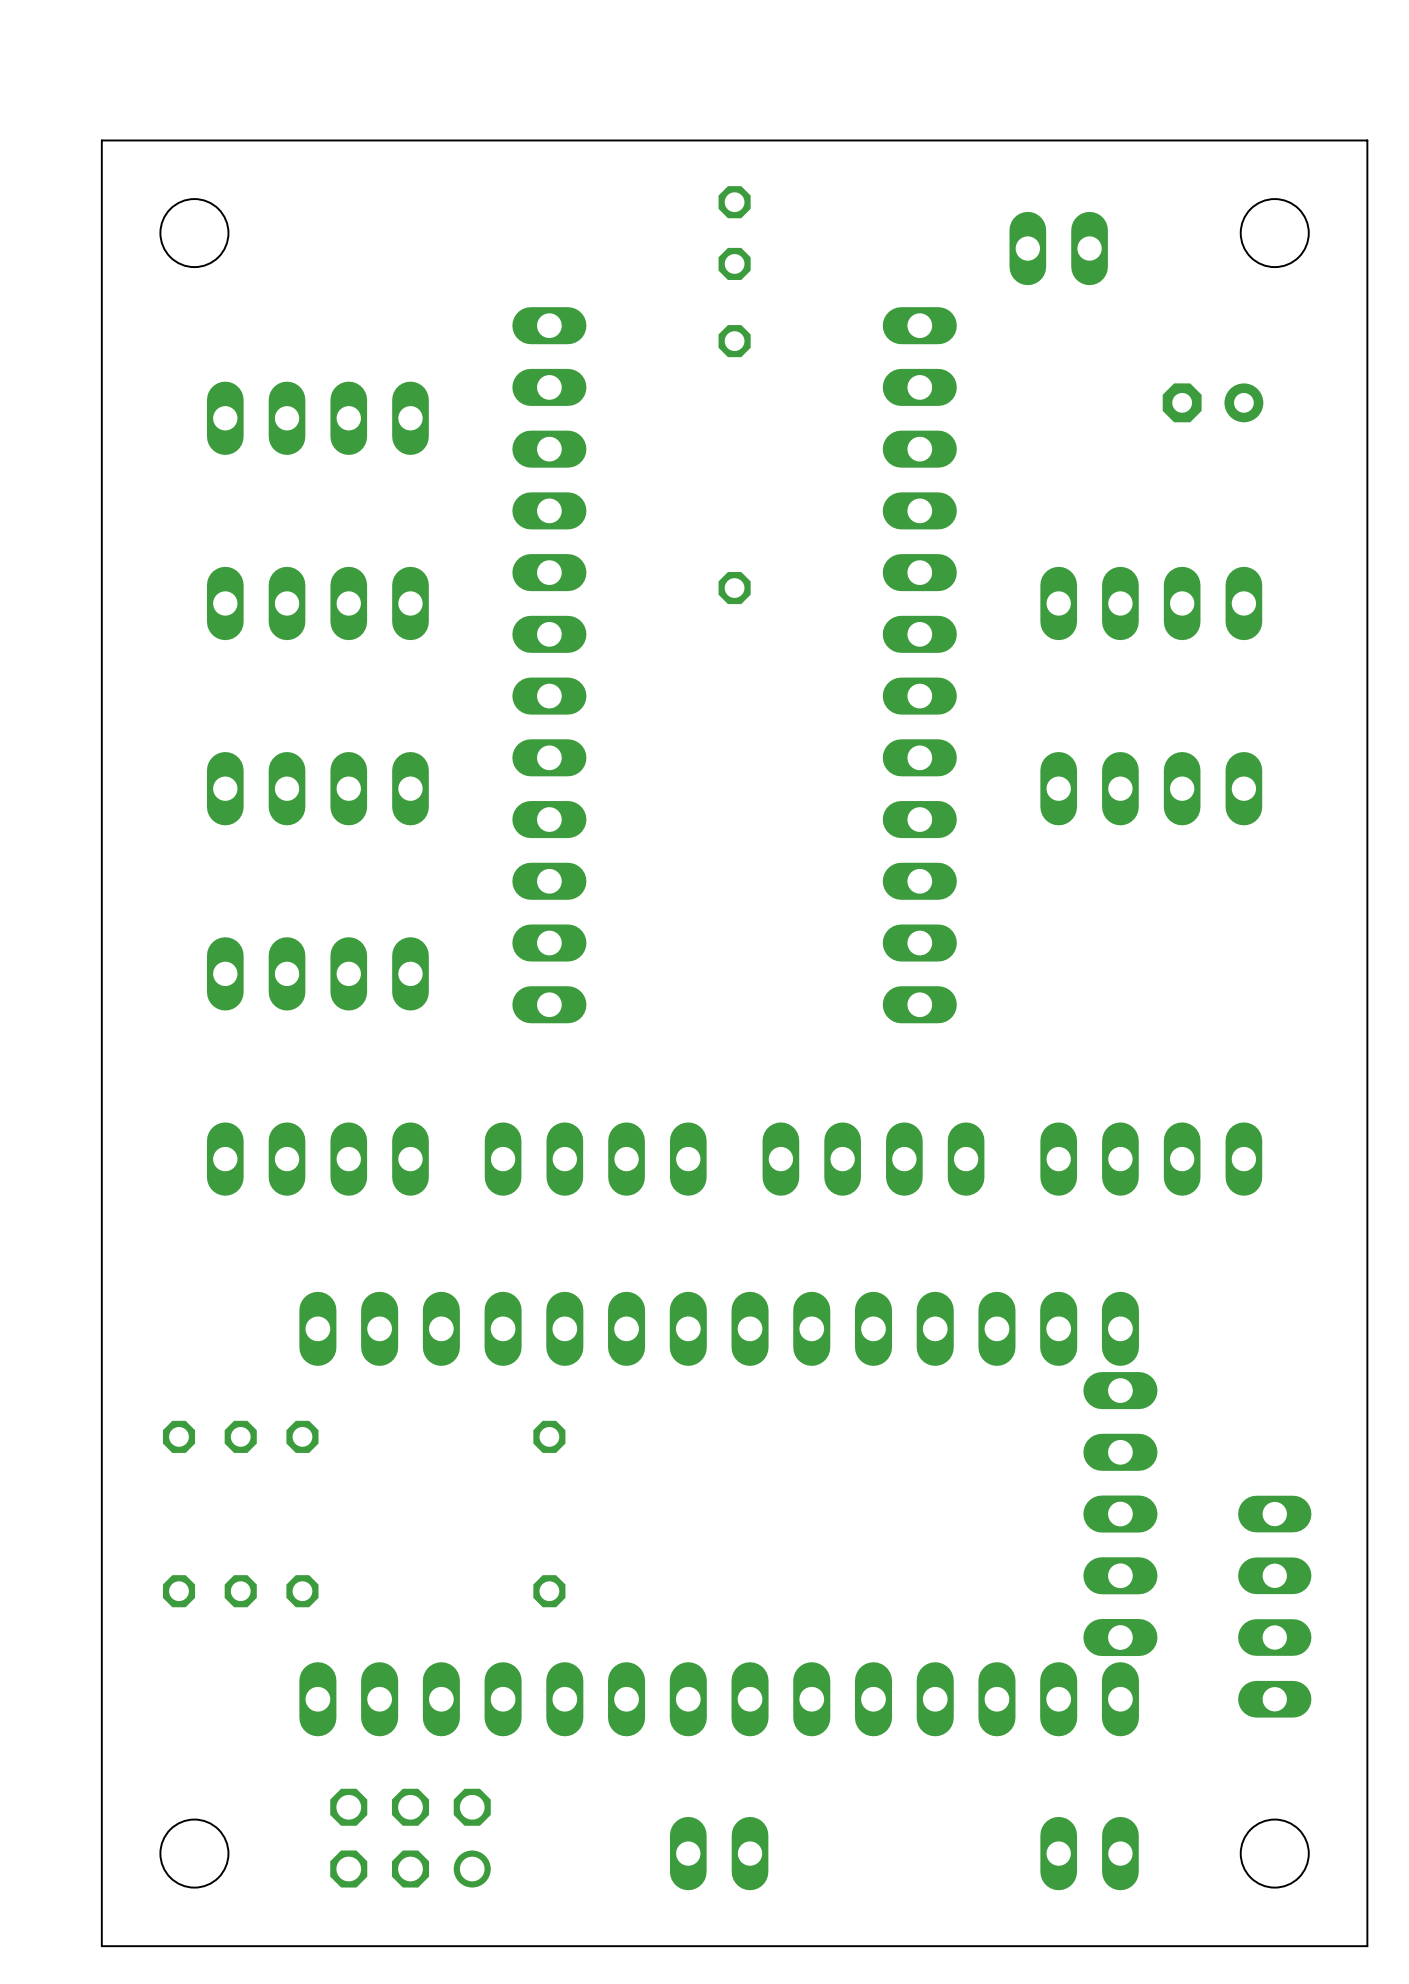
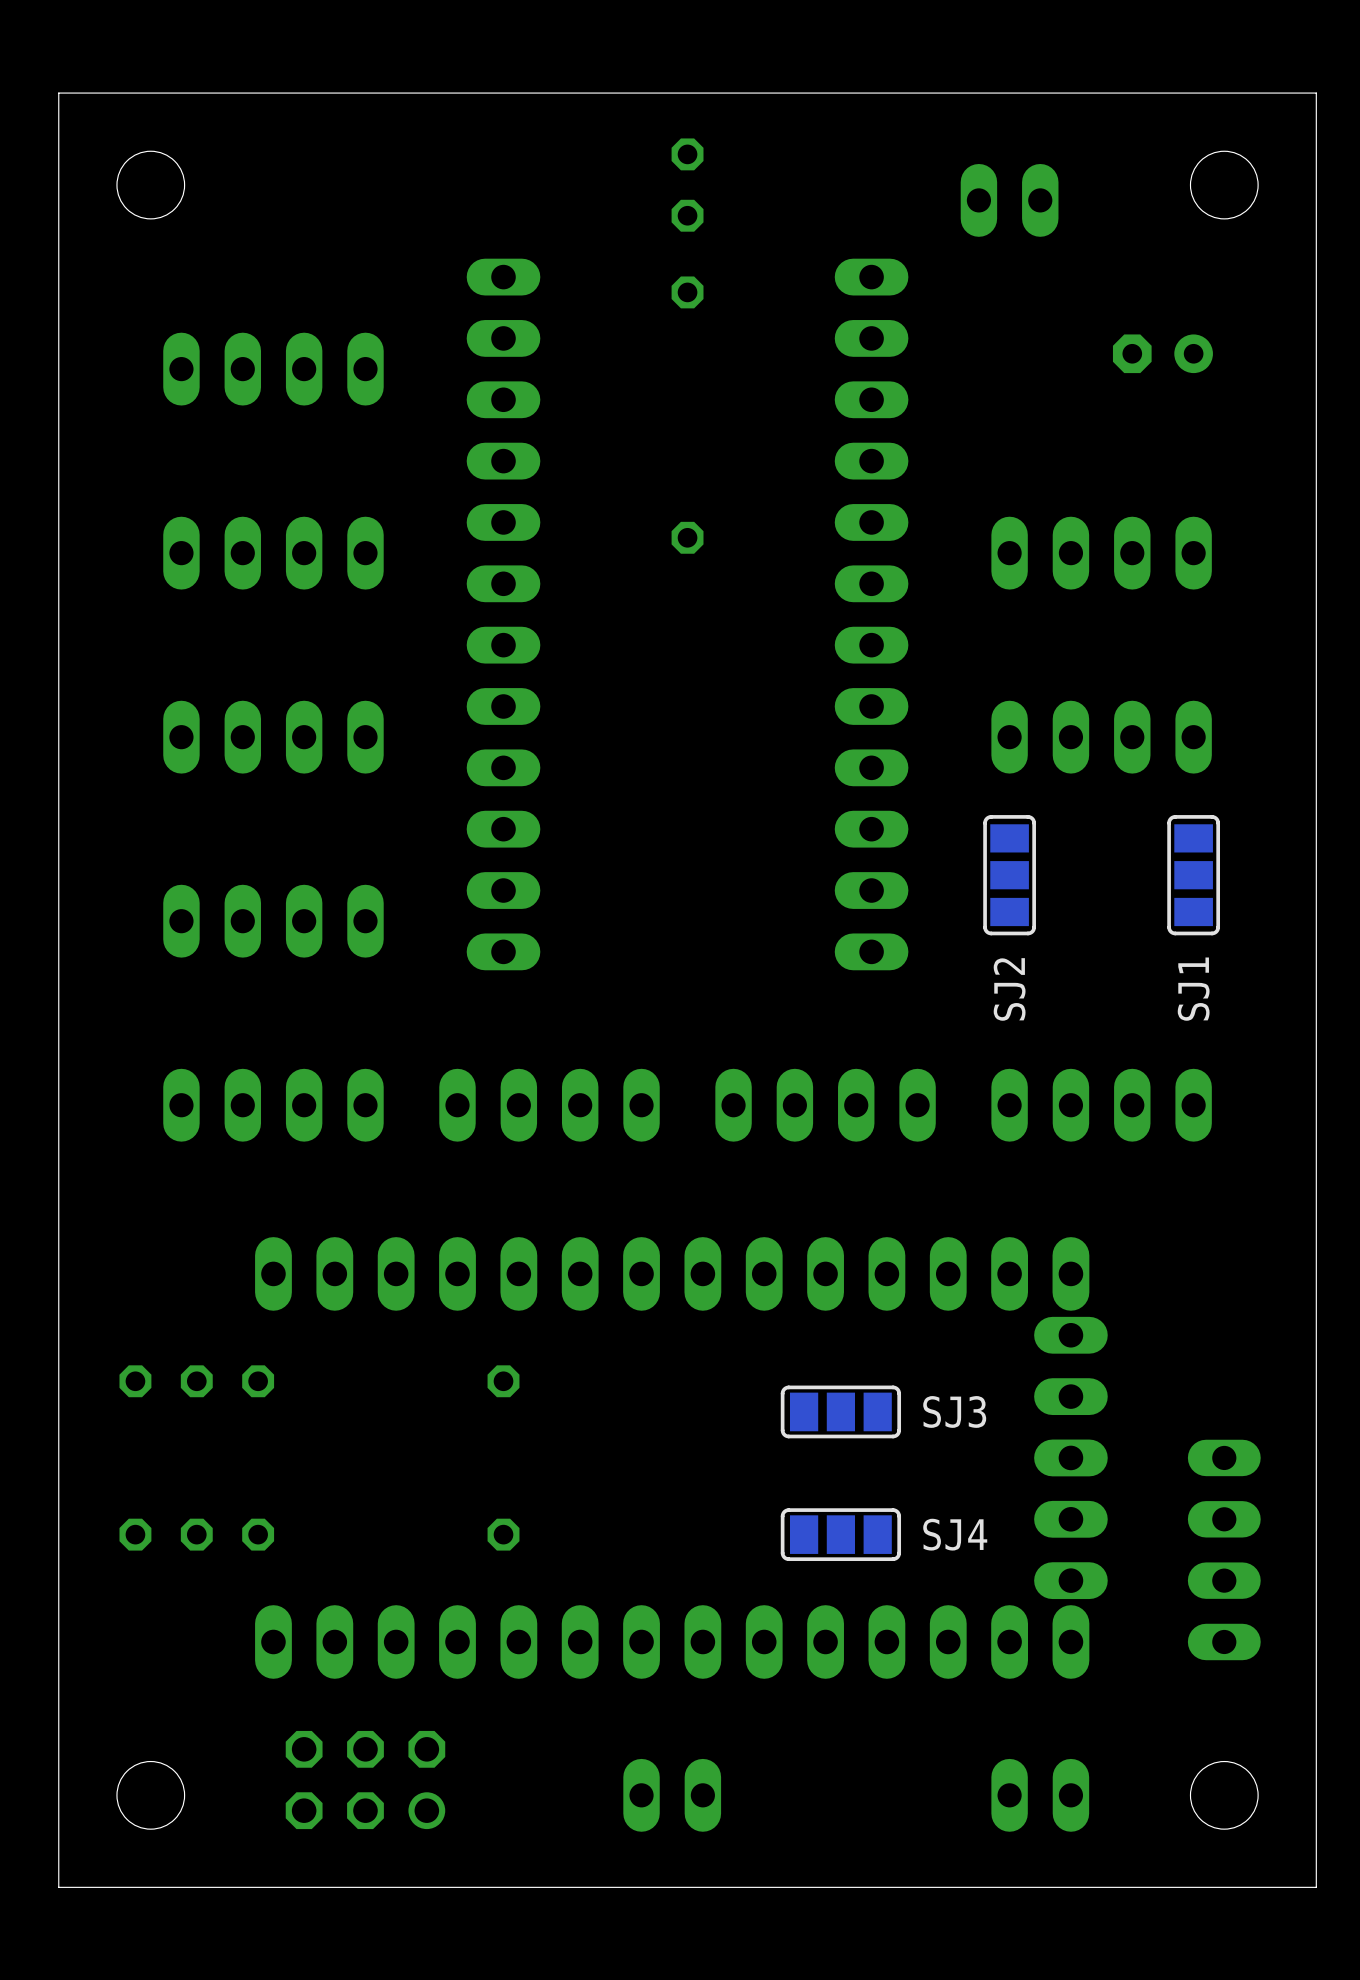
SJ2: none -> (1009, 875)
SJ1: none -> (1193, 875)
SJ3: none -> (840, 1411)
SJ4: none -> (840, 1534)

